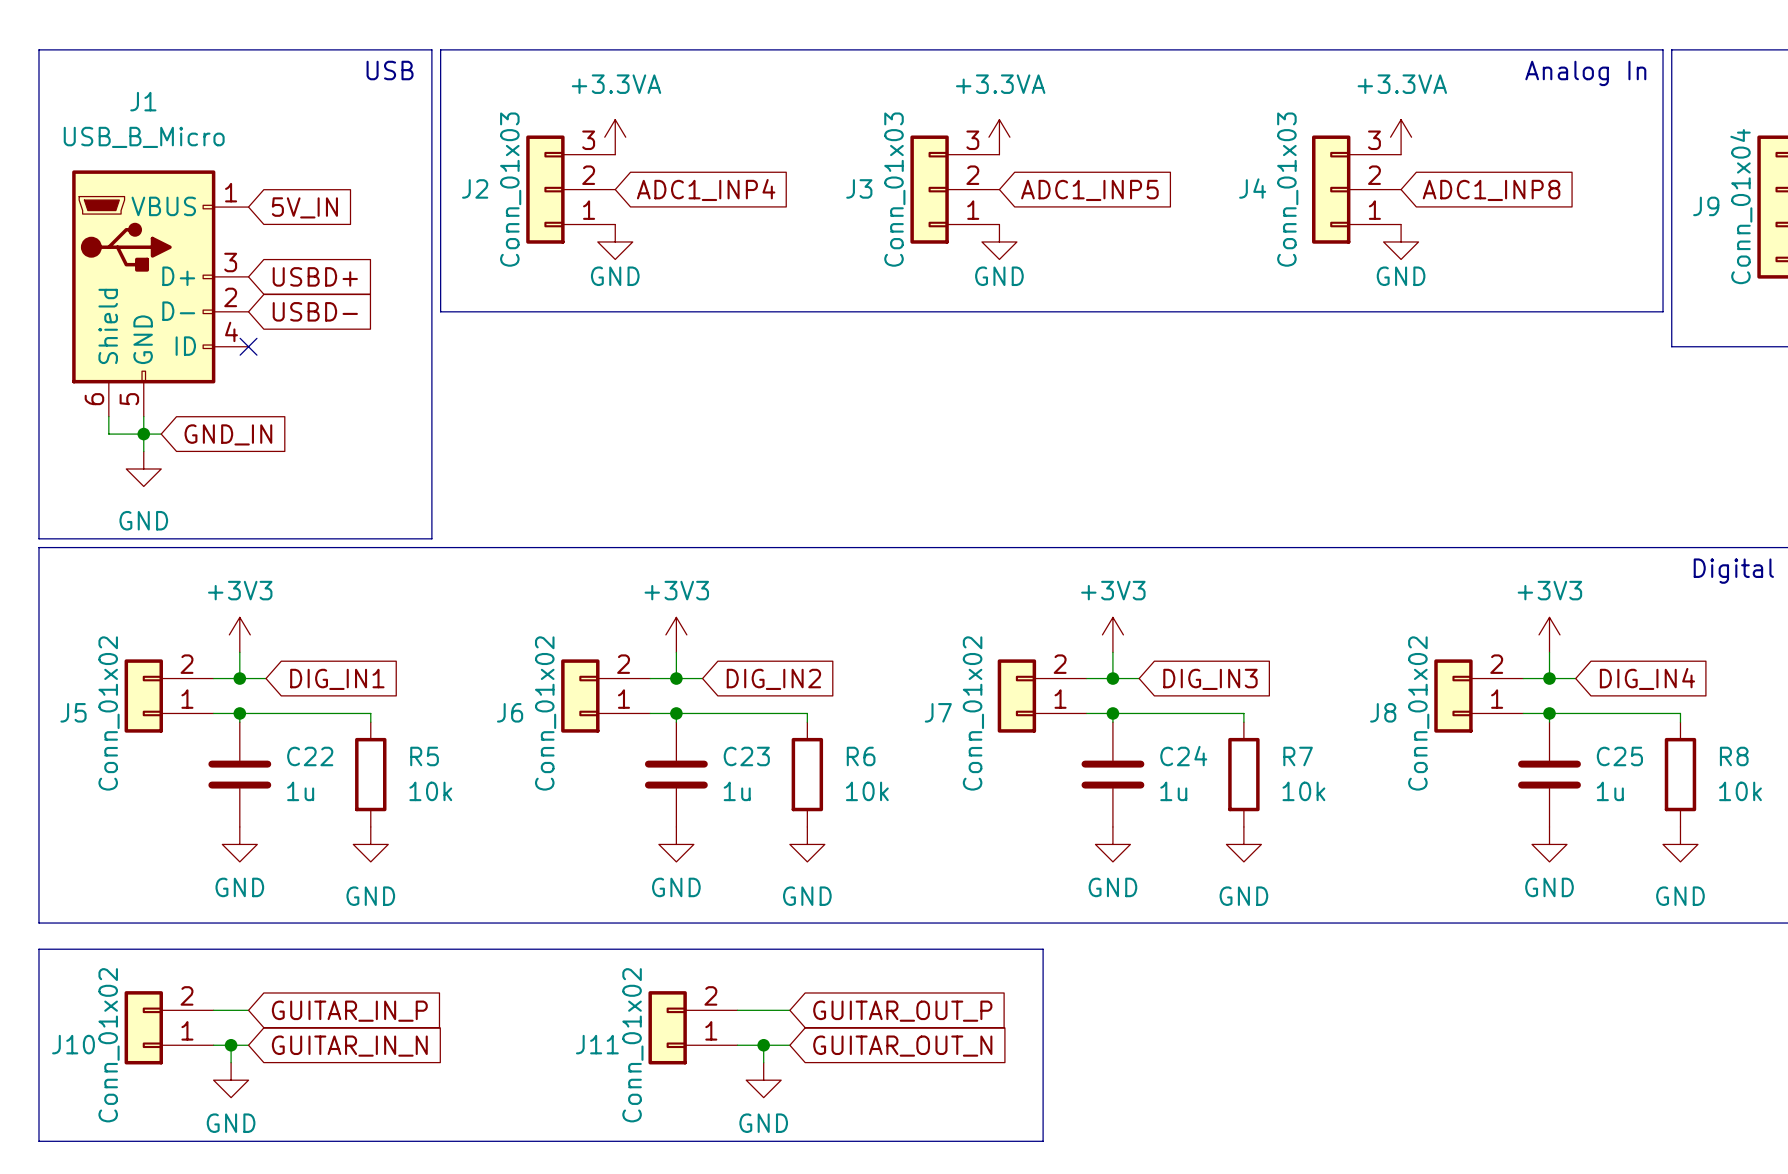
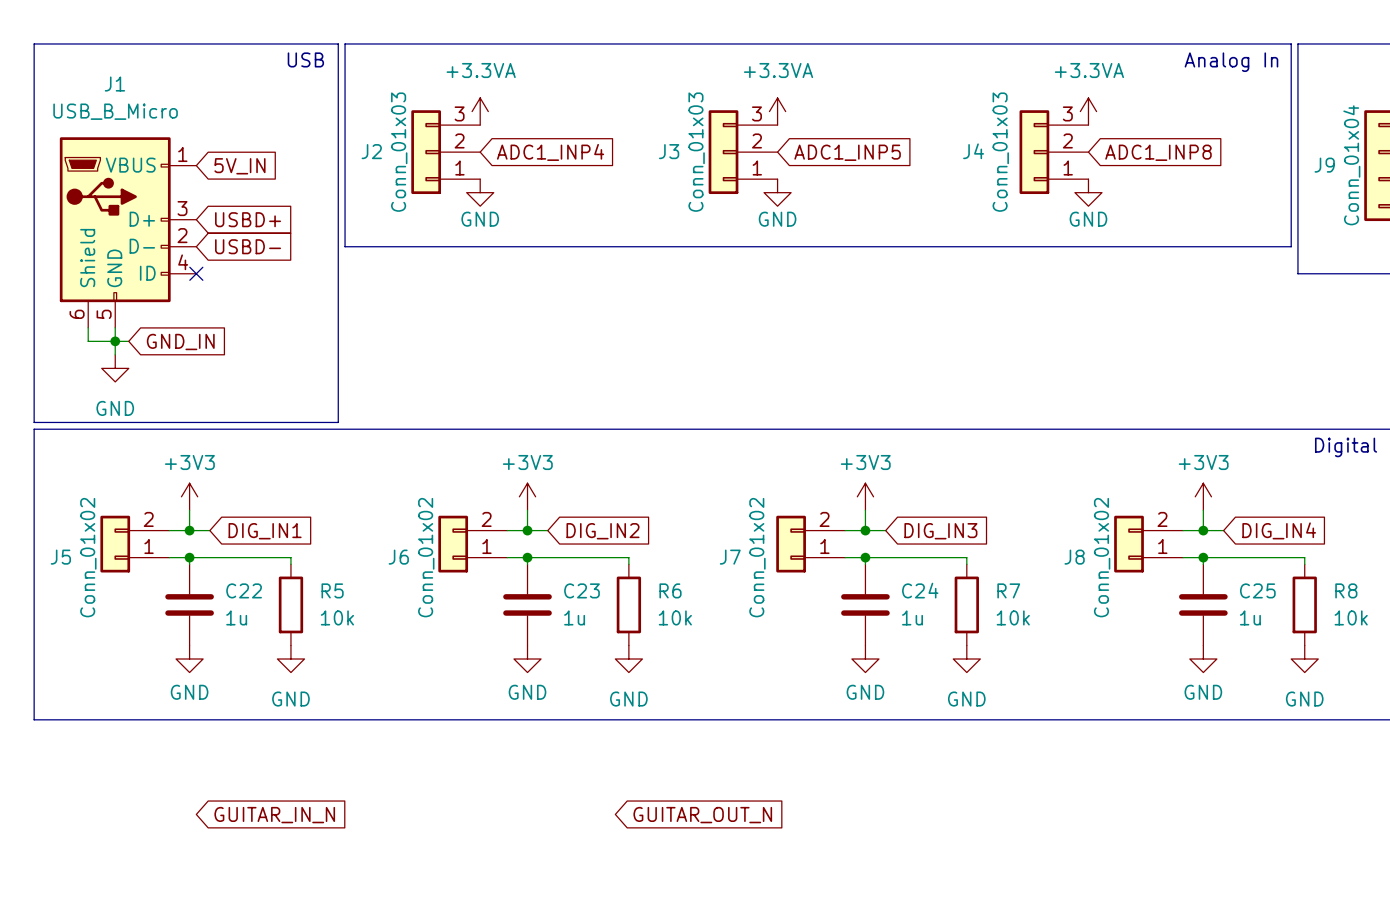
line: (38, 949) (1043, 949) (1043, 1141) (38, 1141) (38, 949) -> none
wire: (213, 1010) (248, 1010) -> none
wire: (737, 1010) (789, 1010) -> none
global label: GUITAR_IN_P (349, 1011) -> none
global label: GUITAR_OUT_P (902, 1011) -> none
J10: Conn_01x02 (169, 1027) -> none
J11: Conn_01x02 (692, 1027) -> none
wire: (213, 1045) (248, 1045) -> none
wire: (231, 1045) (231, 1062) -> none
junction: (231, 1045) -> none
wire: (737, 1045) (789, 1045) -> none
wire: (763, 1045) (763, 1062) -> none
junction: (763, 1045) -> none
power symbol: GND (231, 1080) -> none
power symbol: GND (763, 1080) -> none

